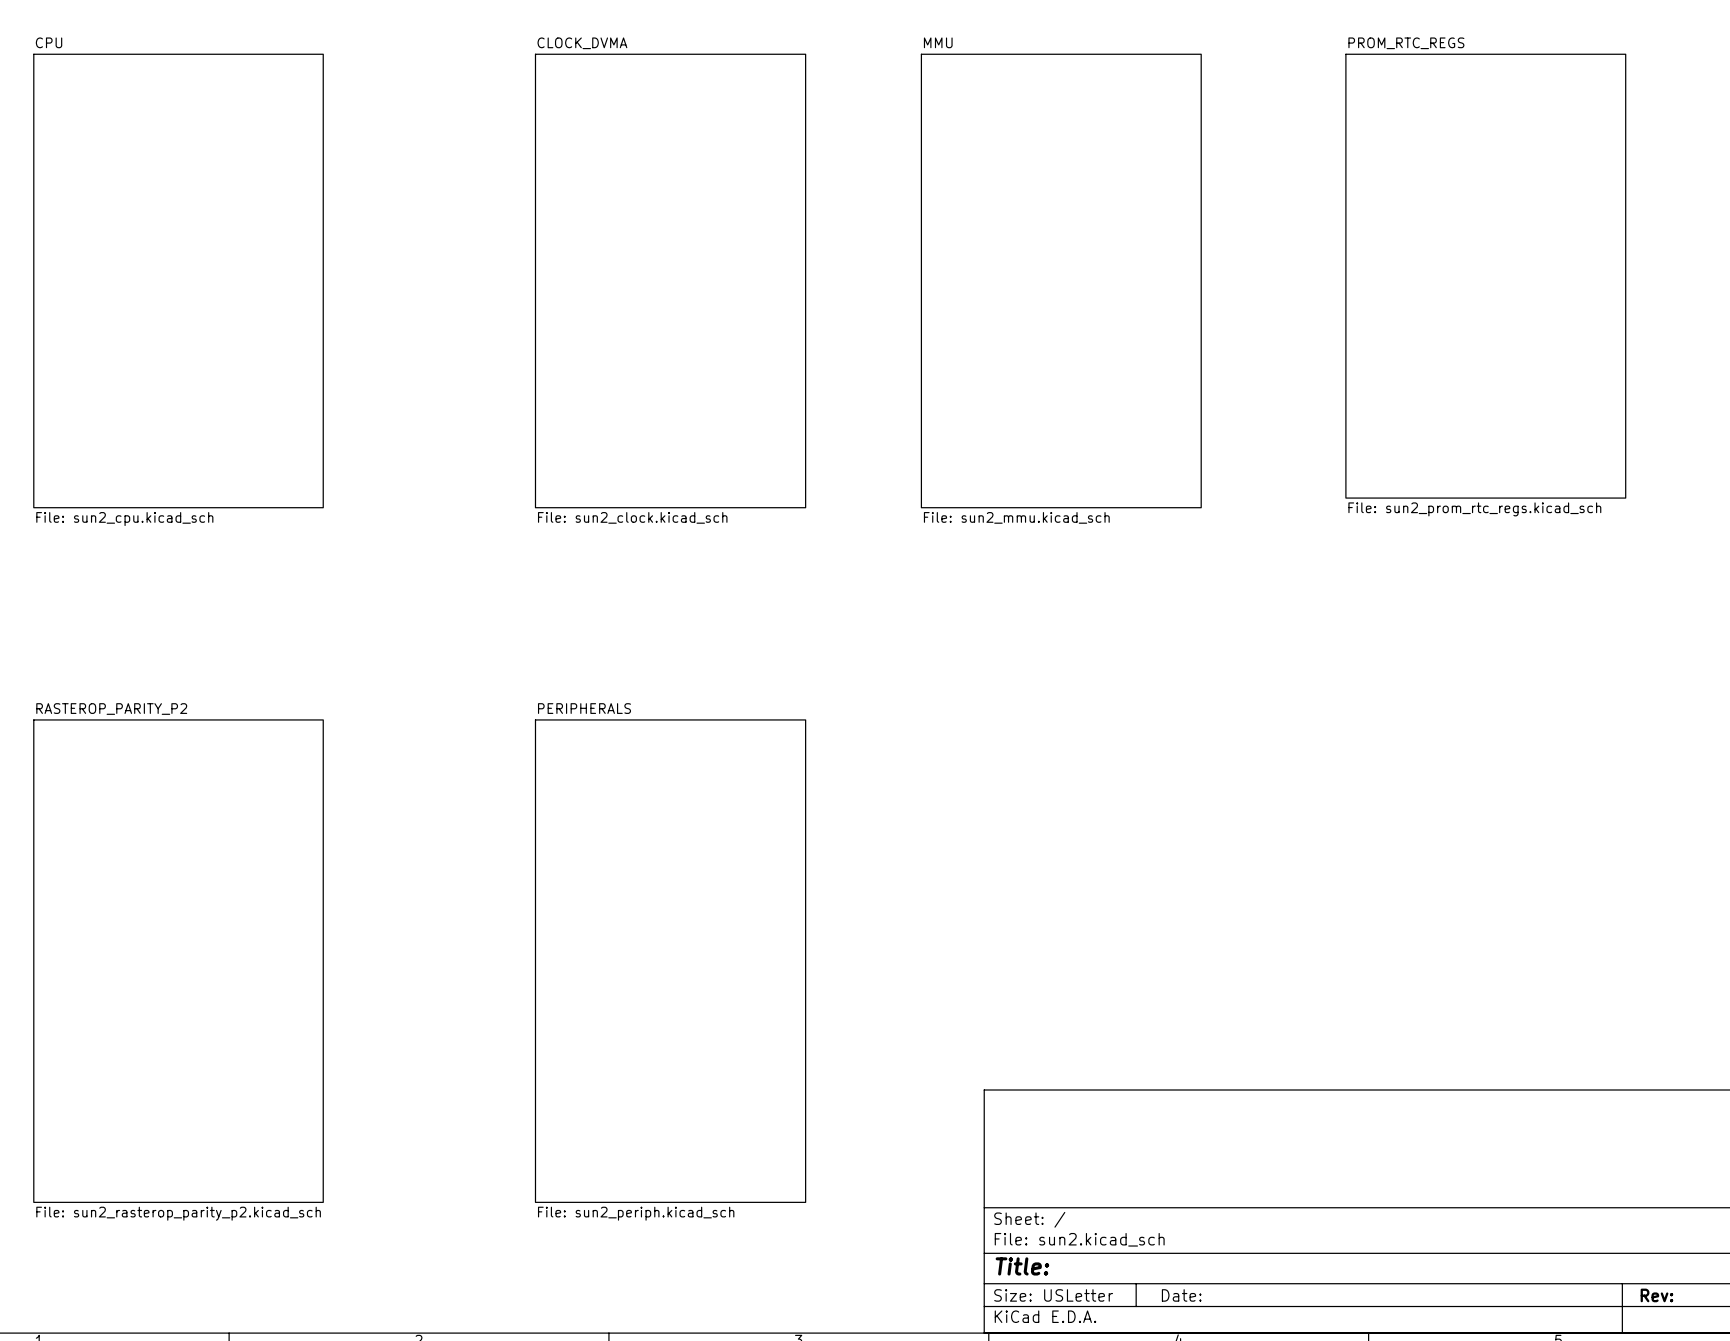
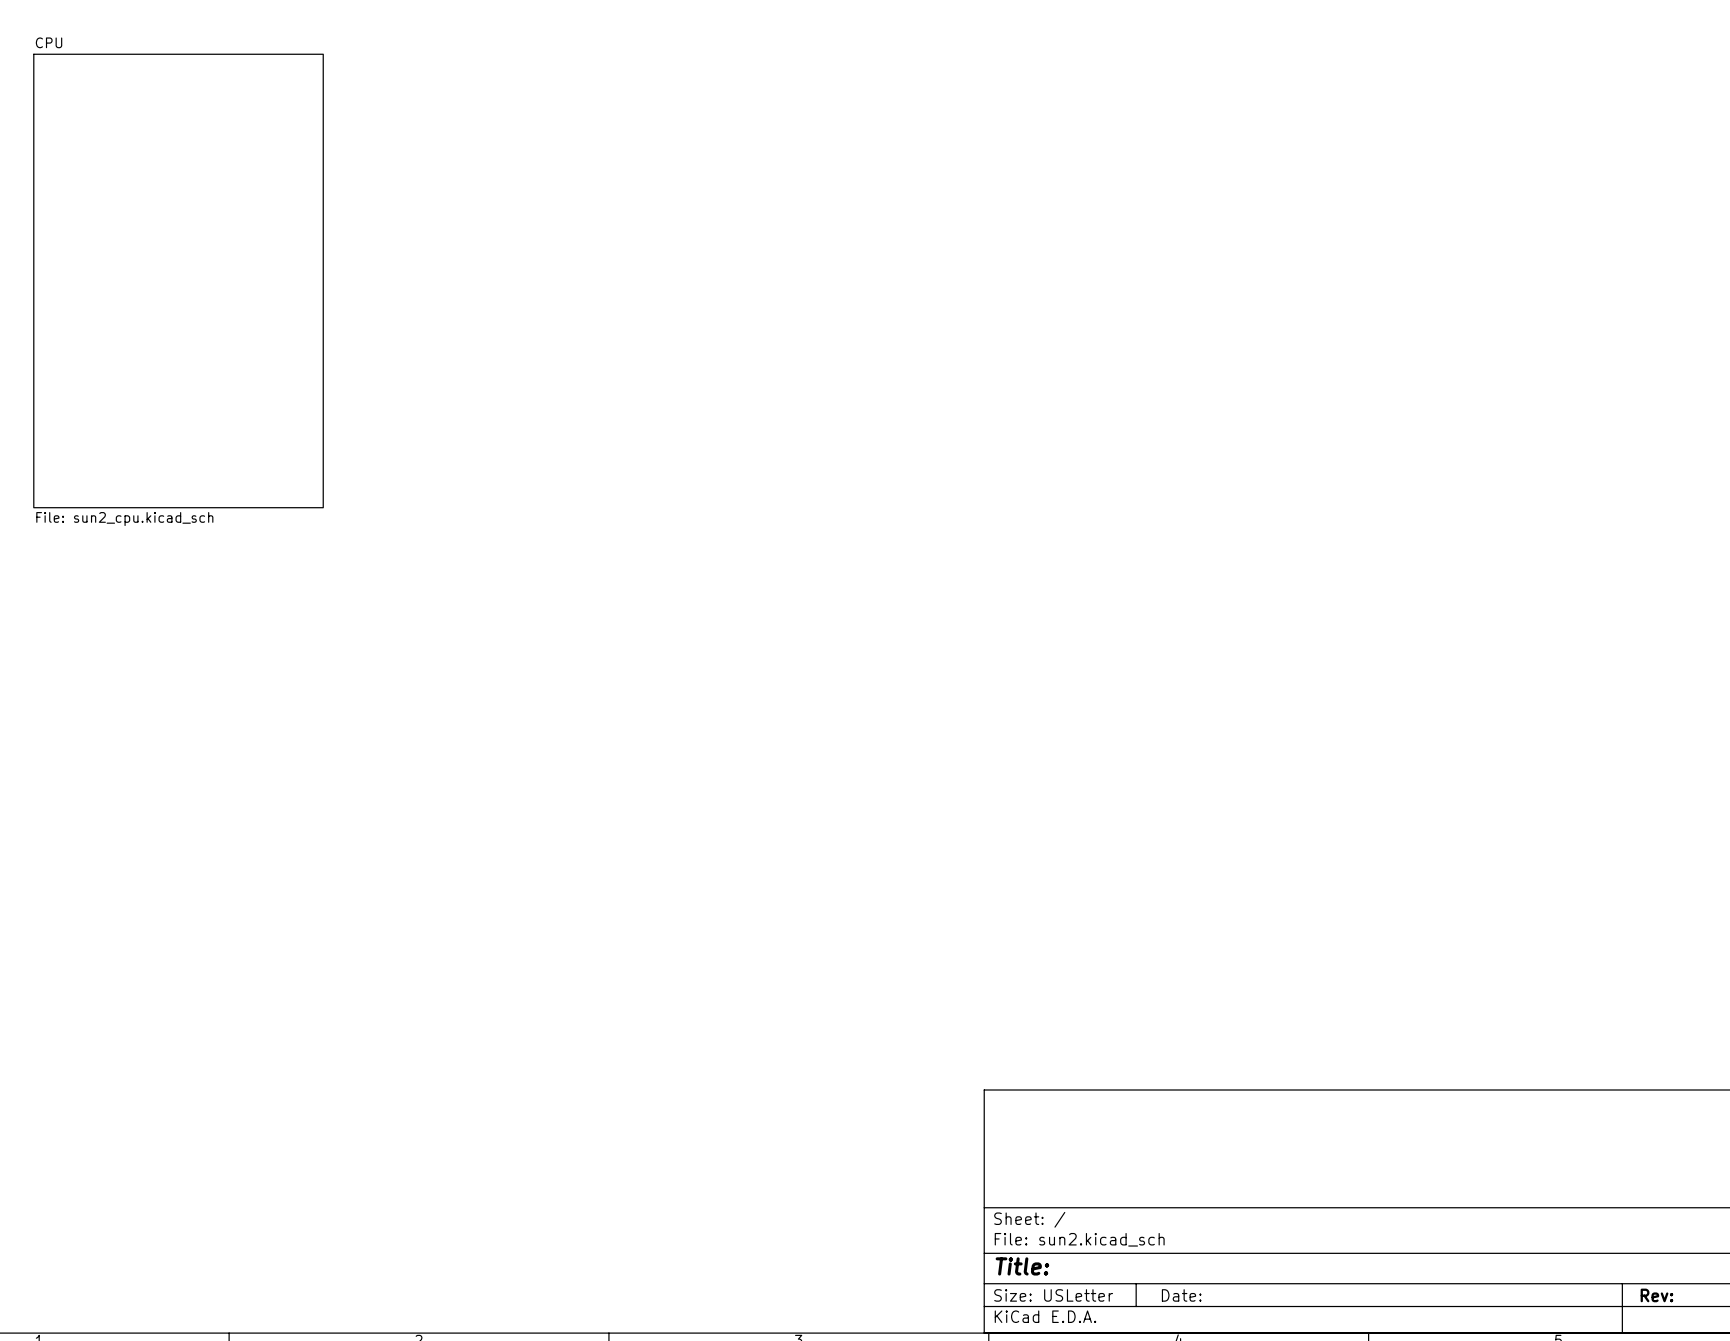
sheet PROM_RTC_REGS: File: sun2_prom_rtc_regs.kicad_sch (1485, 276) -> none
sheet CLOCK_DVMA: File: sun2_clock.kicad_sch (670, 280) -> none
sheet MMU: File: sun2_mmu.kicad_sch (1061, 280) -> none
sheet RASTEROP_PARITY_P2: File: sun2_rasterop_parity_p2.kicad_sch (178, 961) -> none
sheet PERIPHERALS: File: sun2_periph.kicad_sch (670, 961) -> none

